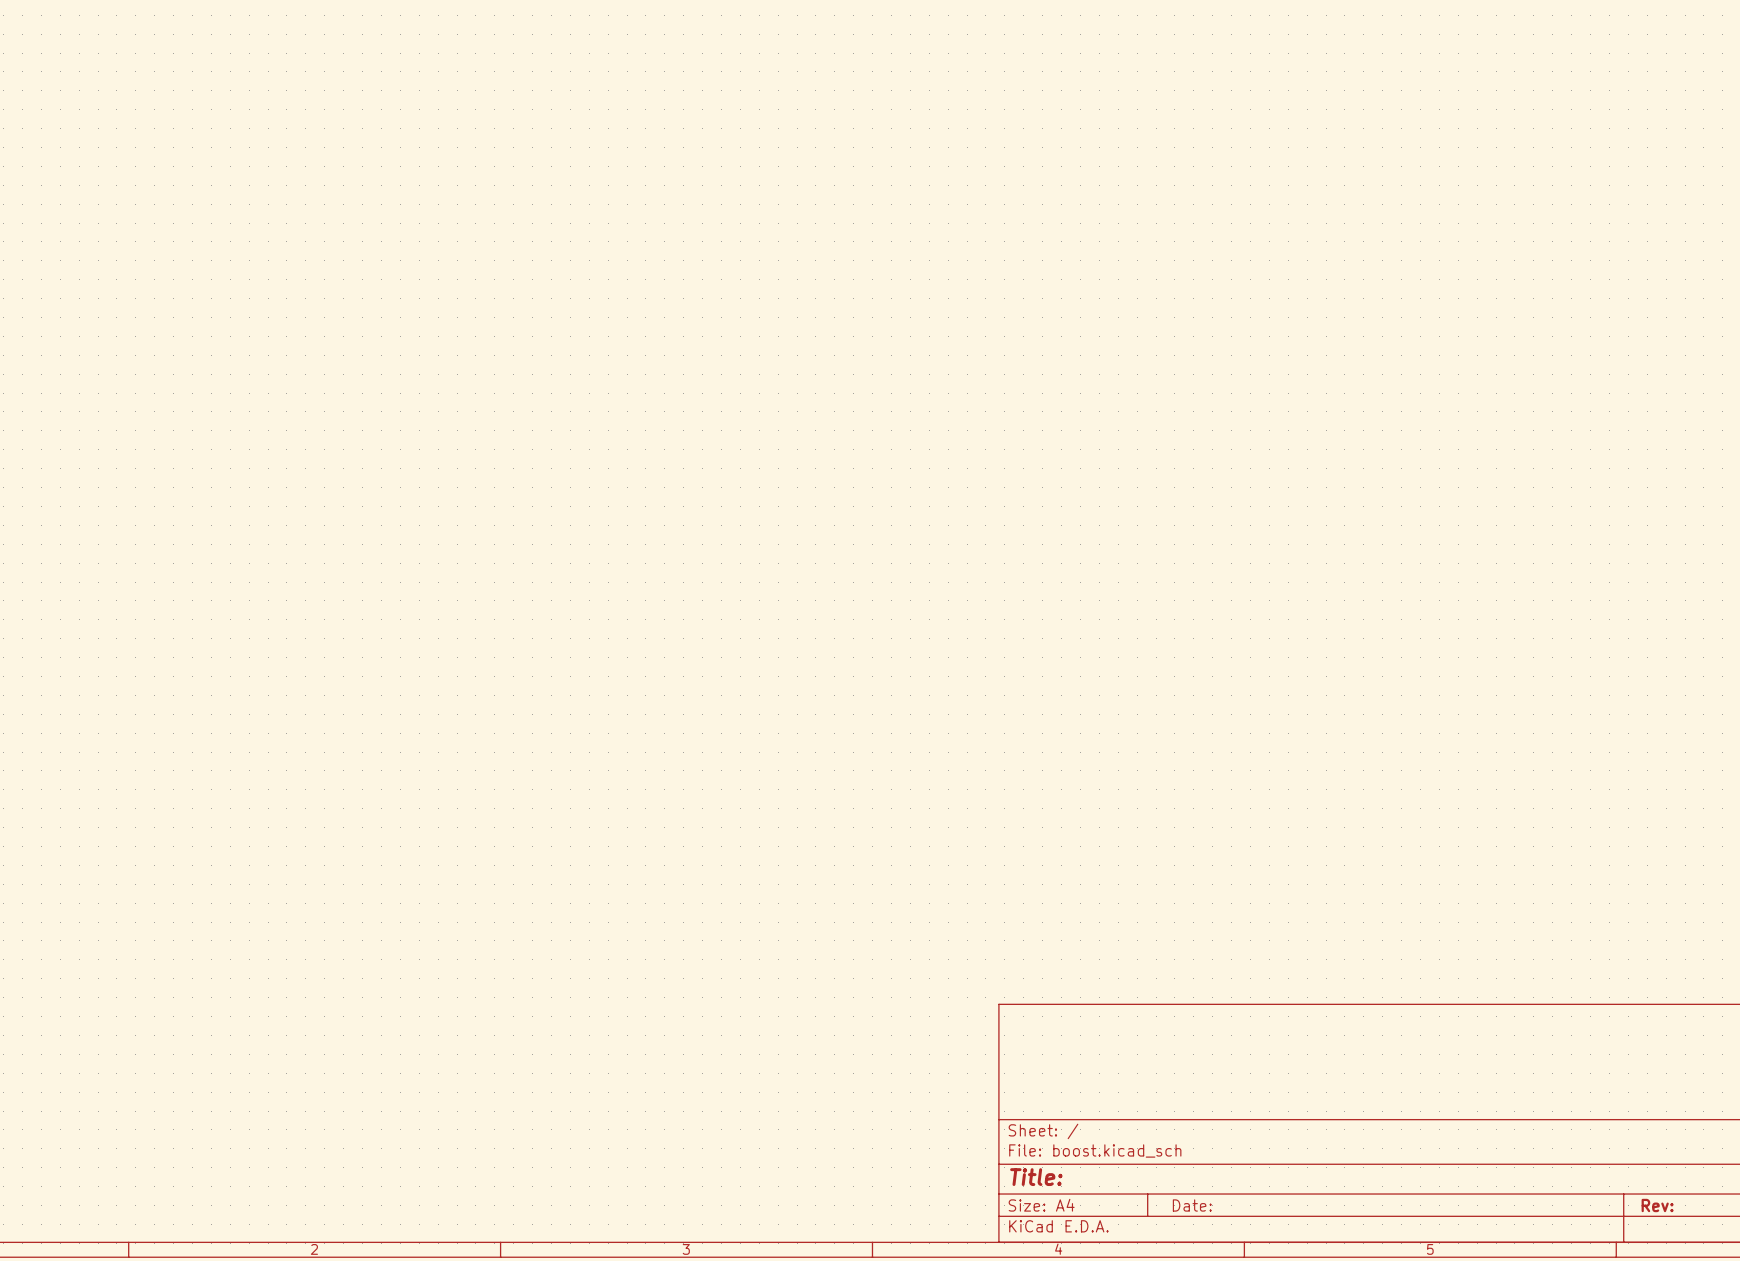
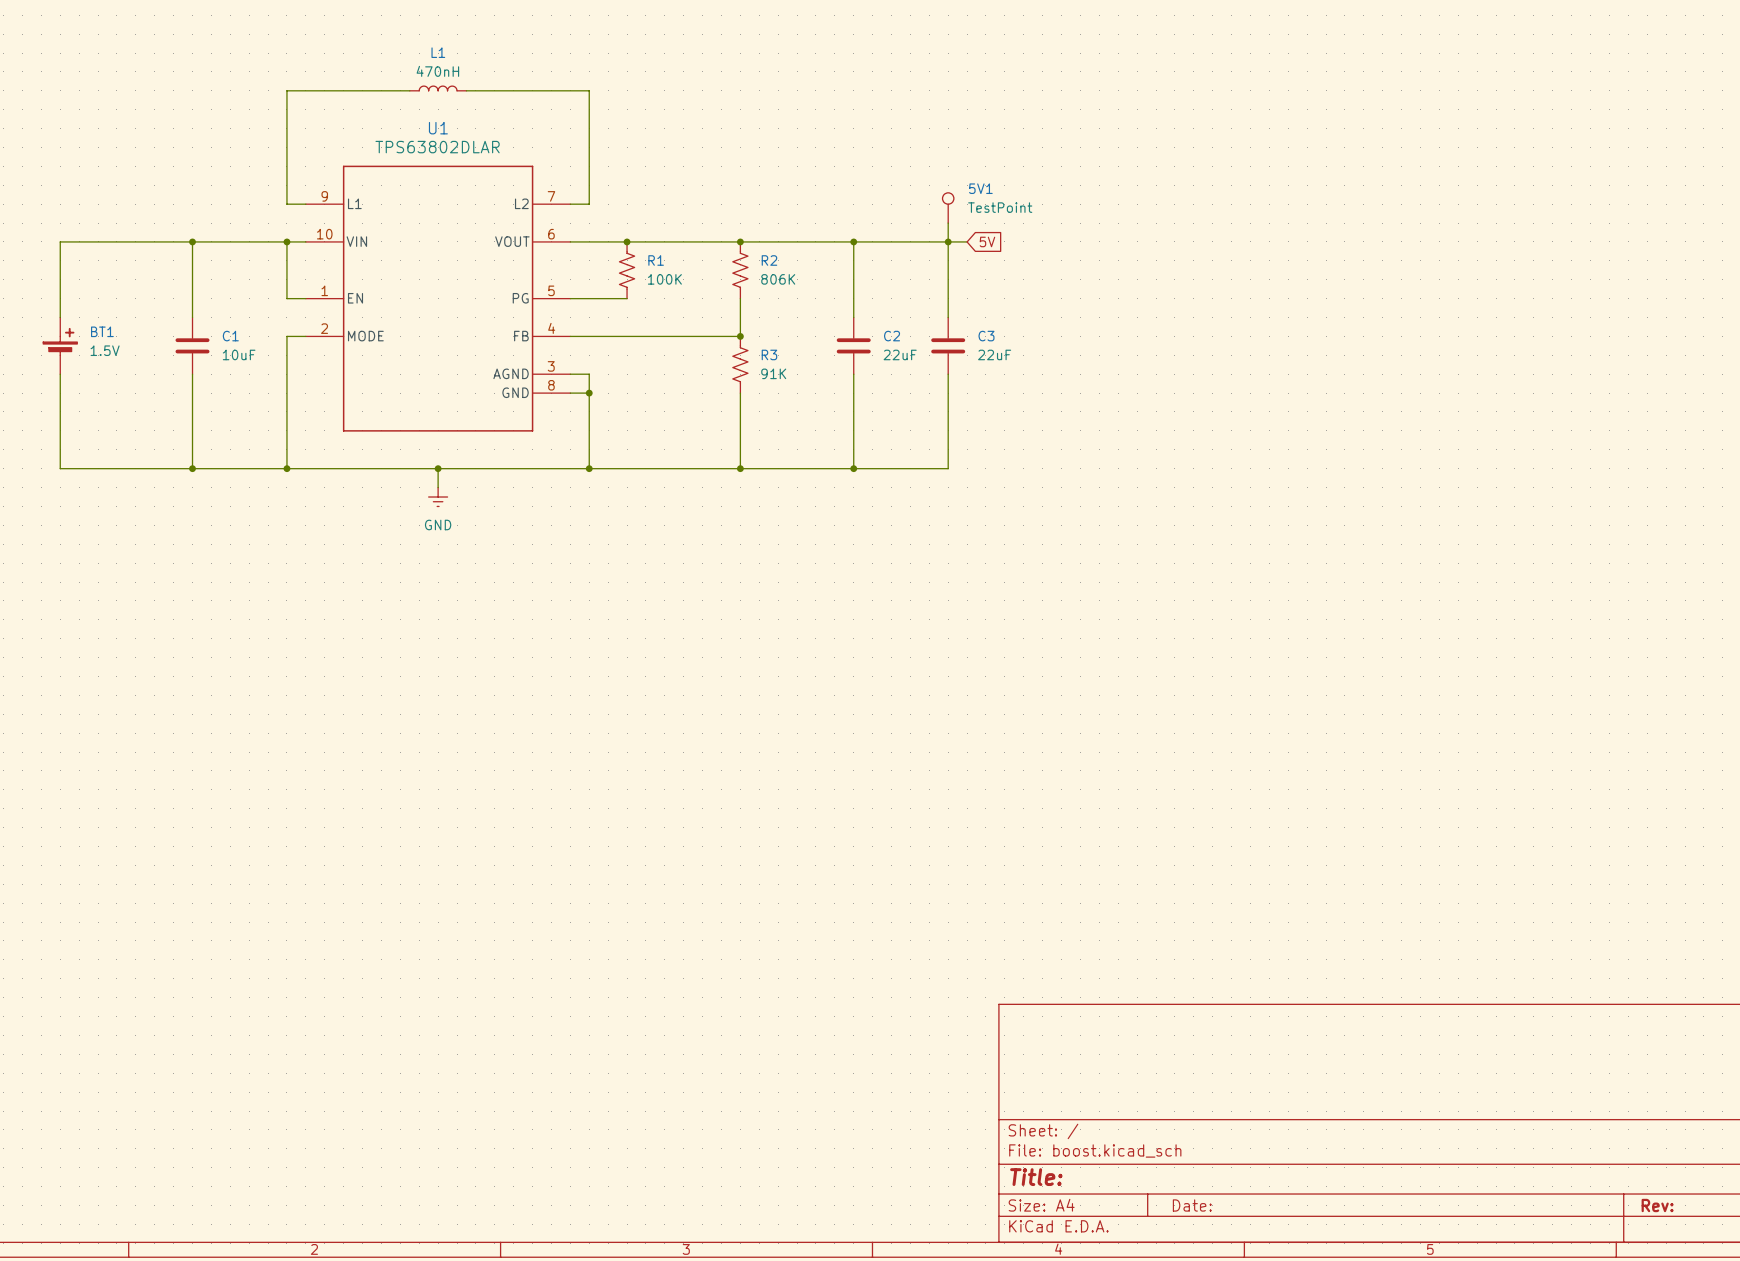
L1: none -> 470nH (438, 88)
wire: none -> (409, 90) (286, 90) (286, 204) (305, 204)
wire: none -> (466, 90) (589, 90) (589, 204) (570, 204)
5V1: none -> TestPoint (948, 207)
wire: none -> (948, 223) (948, 317)
wire: none -> (192, 241) (192, 317)
junction: none -> (192, 241)
wire: none -> (286, 241) (286, 298) (305, 298)
junction: none -> (286, 241)
wire: none -> (305, 241) (60, 241) (60, 317)
wire: none -> (570, 241) (967, 241)
junction: none -> (627, 241)
junction: none -> (740, 241)
wire: none -> (853, 241) (853, 317)
junction: none -> (853, 241)
junction: none -> (948, 241)
global label: none -> 5V (987, 241)
R1: none -> 100K (627, 270)
R2: none -> 806K (740, 270)
U1: none -> TPS63802DLAR (438, 298)
wire: none -> (570, 298) (627, 298)
wire: none -> (740, 298) (740, 336) (570, 336)
wire: none -> (305, 336) (286, 336) (286, 468)
junction: none -> (740, 336)
BT1: none -> 1.5V (60, 345)
C1: none -> 10uF (192, 345)
C2: none -> 22uF (853, 345)
C3: none -> 22uF (948, 345)
R3: none -> 91K (740, 364)
wire: none -> (60, 374) (60, 468) (948, 468) (948, 374)
wire: none -> (192, 374) (192, 468)
wire: none -> (570, 374) (589, 374) (589, 468)
wire: none -> (853, 374) (853, 468)
wire: none -> (570, 393) (589, 393)
junction: none -> (589, 393)
wire: none -> (740, 393) (740, 468)
junction: none -> (192, 468)
junction: none -> (286, 468)
wire: none -> (438, 468) (438, 487)
junction: none -> (438, 468)
junction: none -> (589, 468)
junction: none -> (740, 468)
junction: none -> (853, 468)
power symbol: none -> GND (438, 497)

